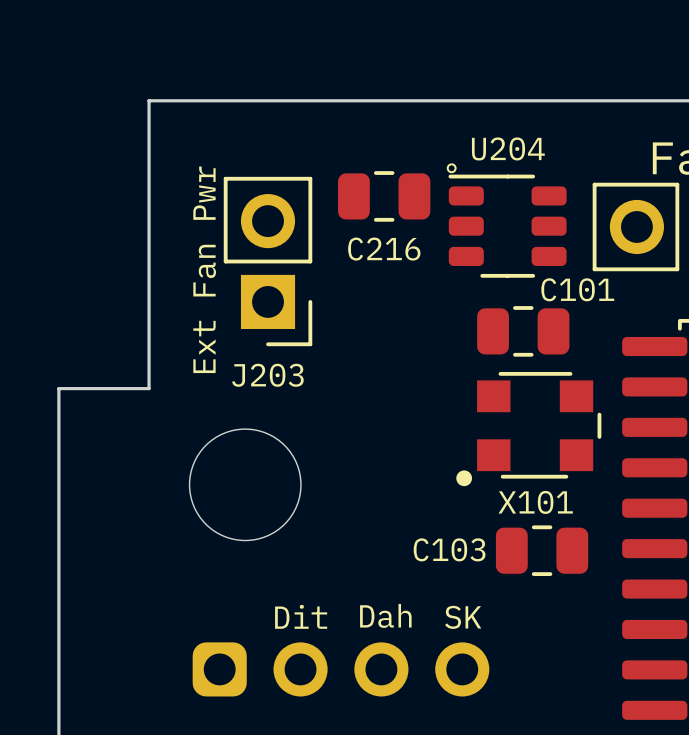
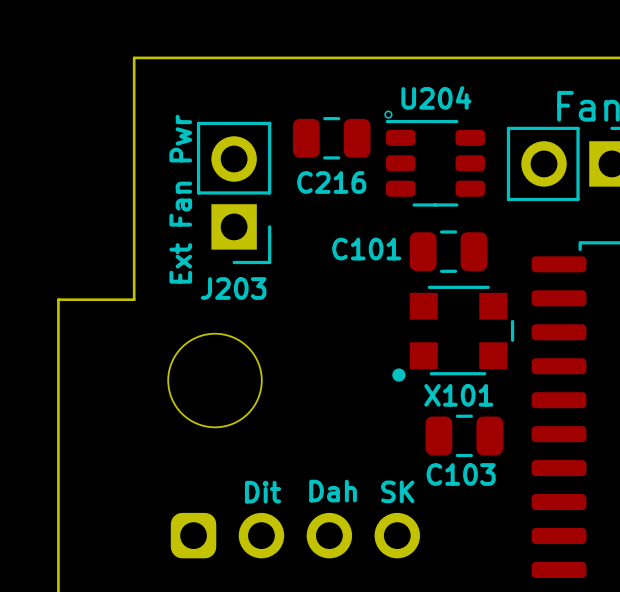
C101 name position: C101 (577, 289) -> C101 (366, 249)
C103 name position: C103 (449, 549) -> C103 (461, 474)

